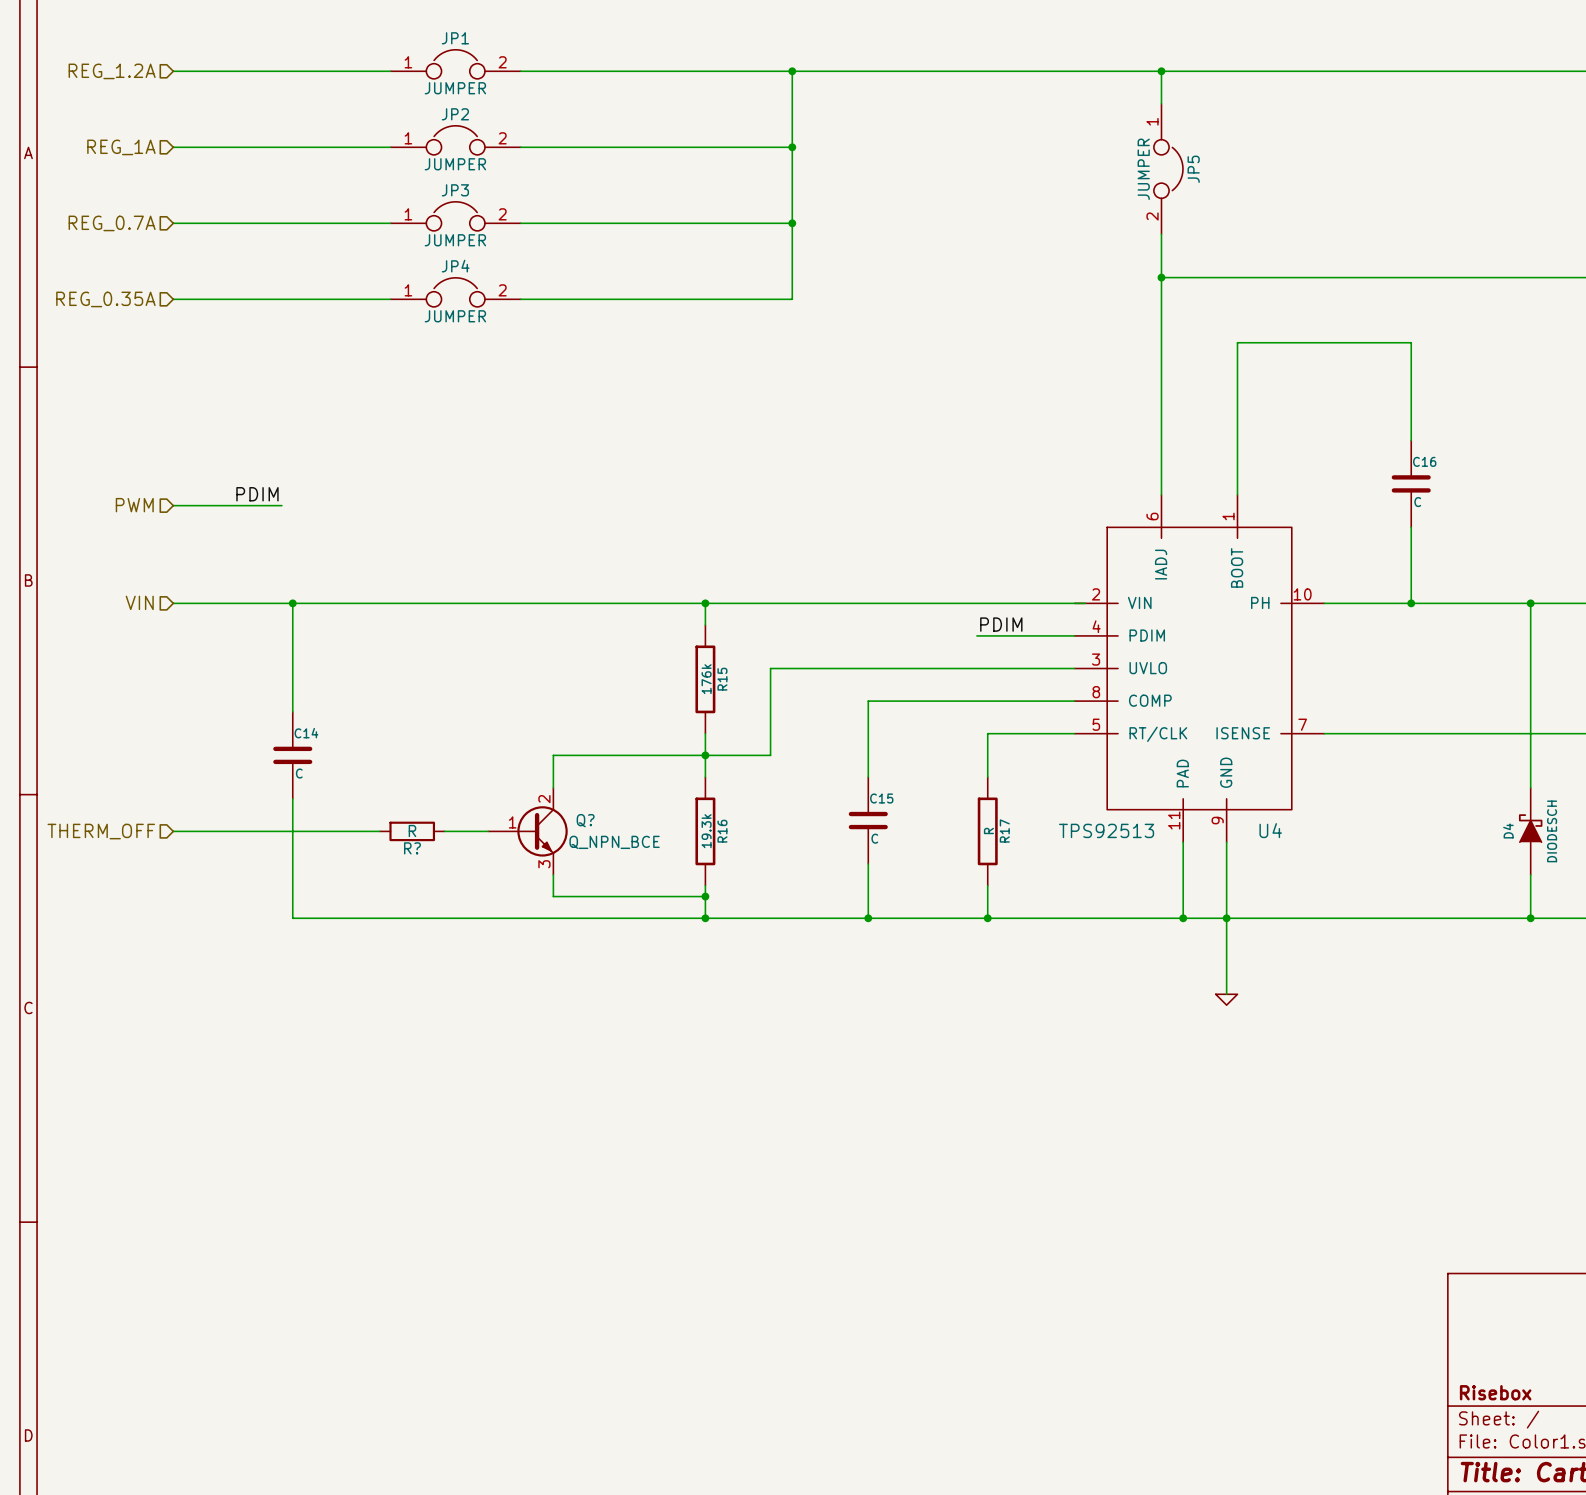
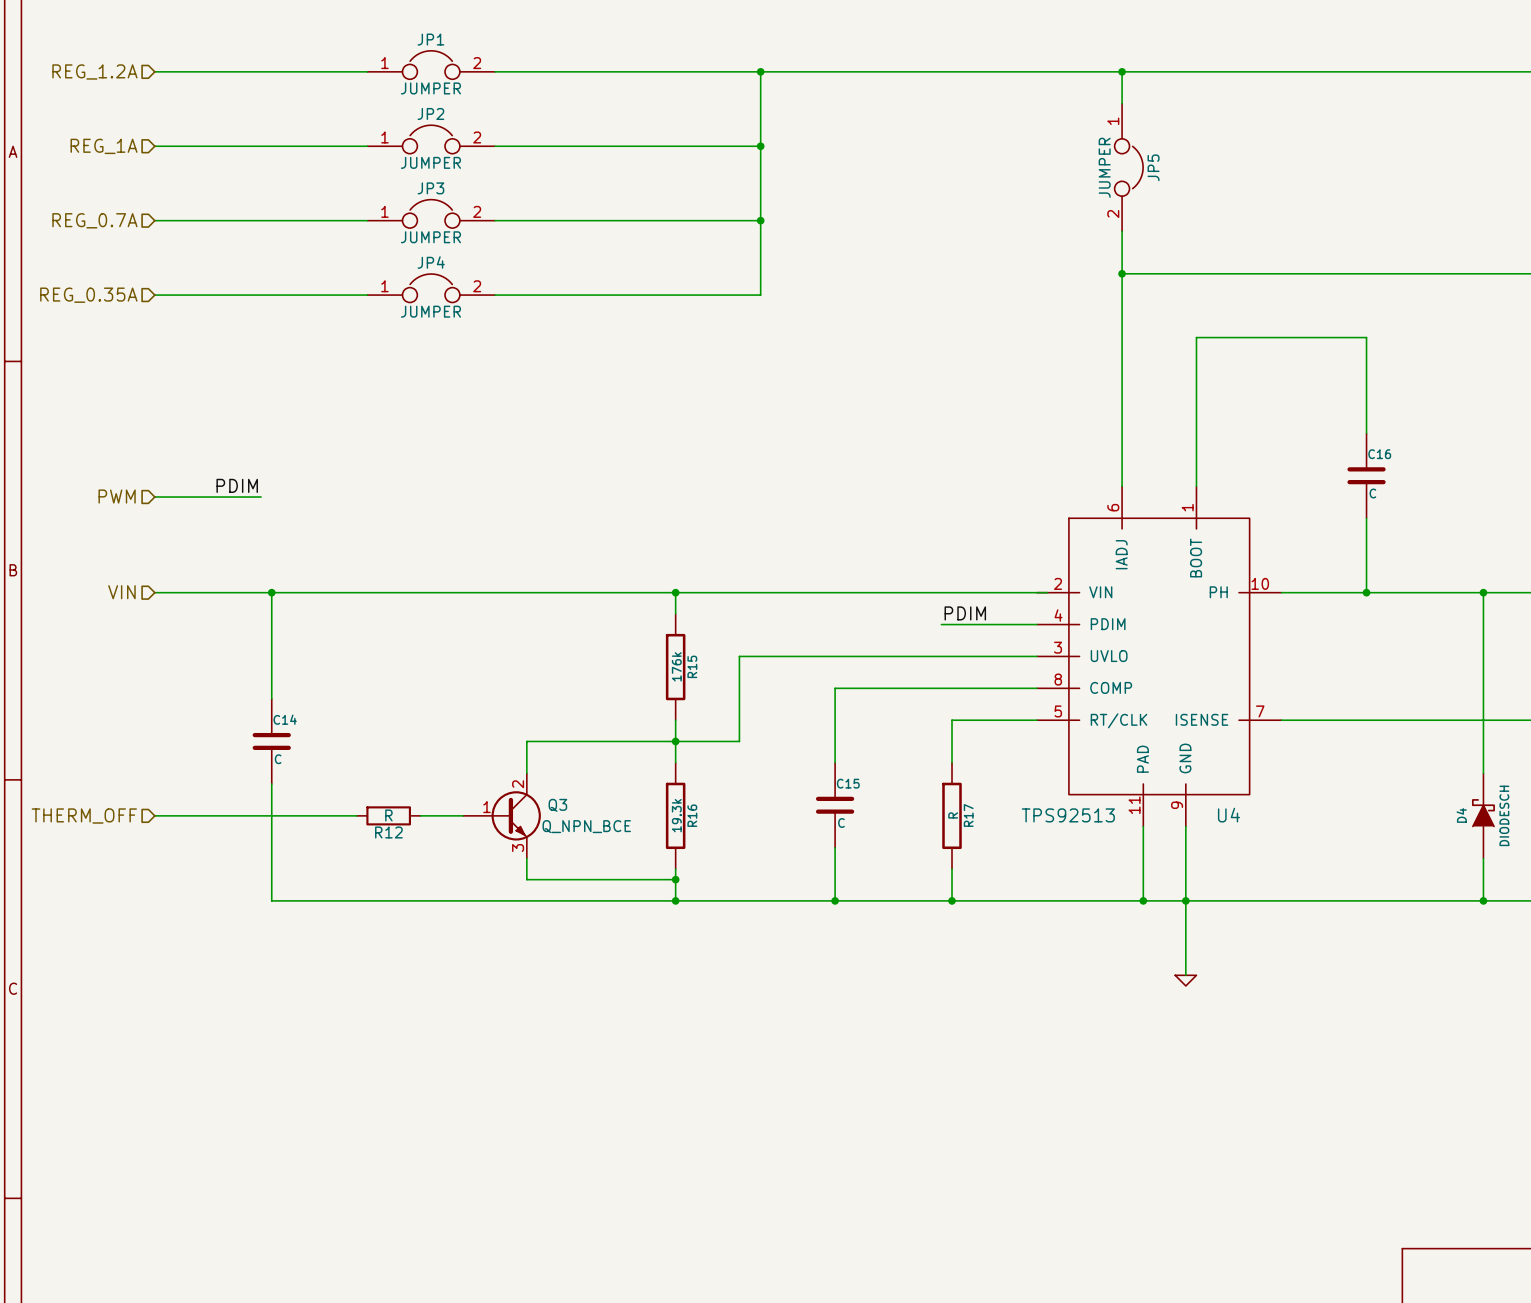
Q? name: Q? (585, 820) -> Q3 (557, 805)
R? name: R? (412, 848) -> R12 (388, 832)

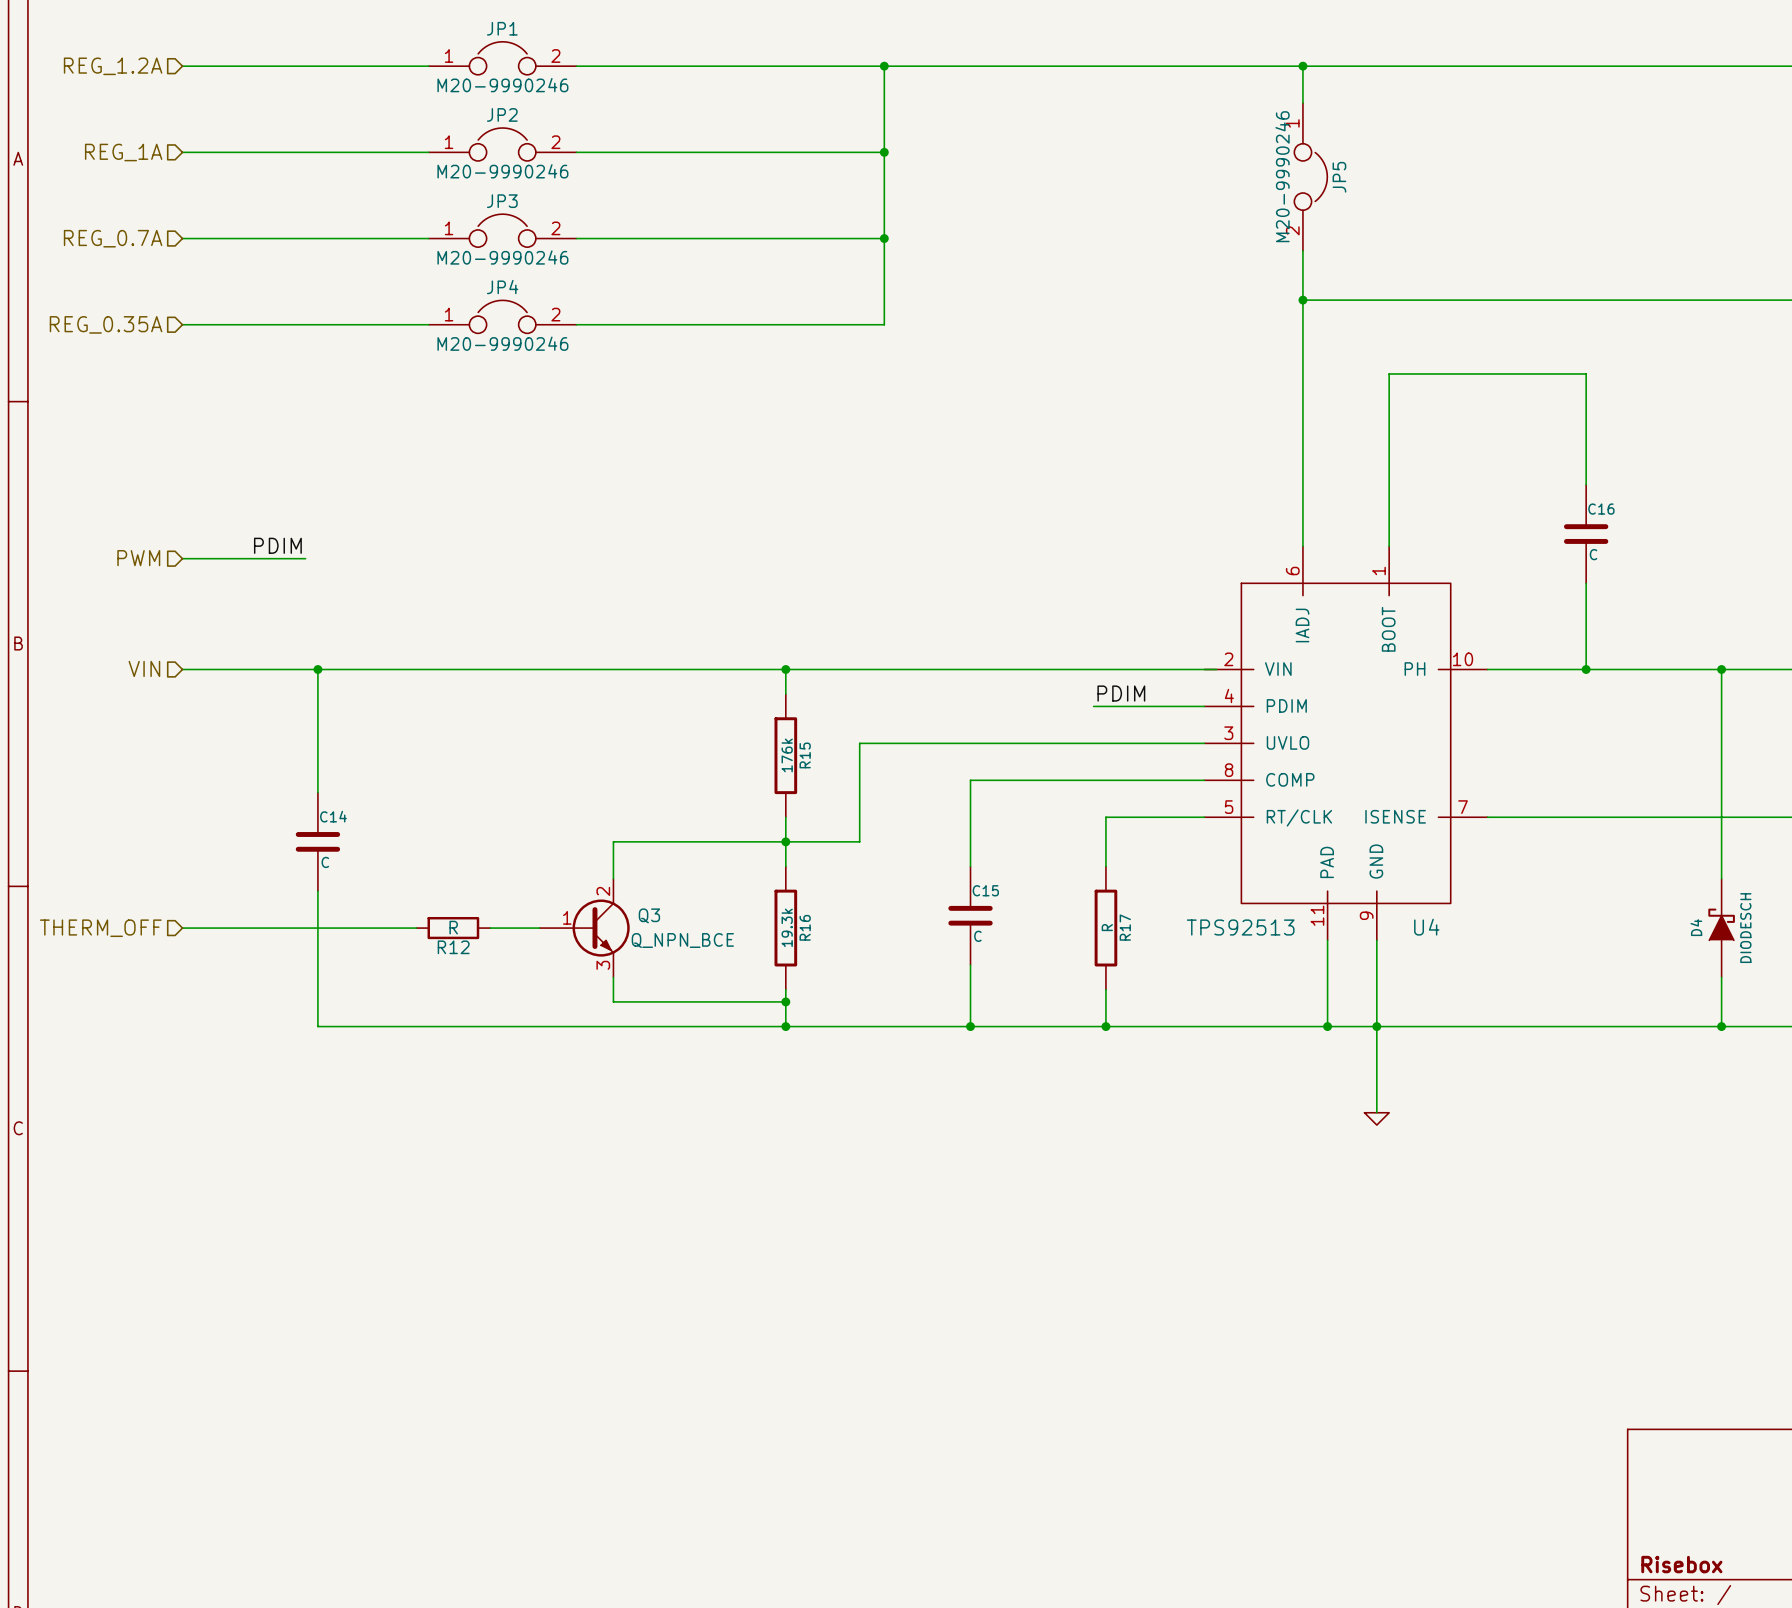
JP1 value: JUMPER (430, 88) -> M20-9990246 (502, 85)
JP2 value: JUMPER (430, 162) -> M20-9990246 (502, 171)
JP5 value: JUMPER (1104, 167) -> M20-9990246 (1282, 176)
JP3 value: JUMPER (430, 237) -> M20-9990246 (502, 257)
JP4 value: JUMPER (430, 311) -> M20-9990246 (502, 343)

